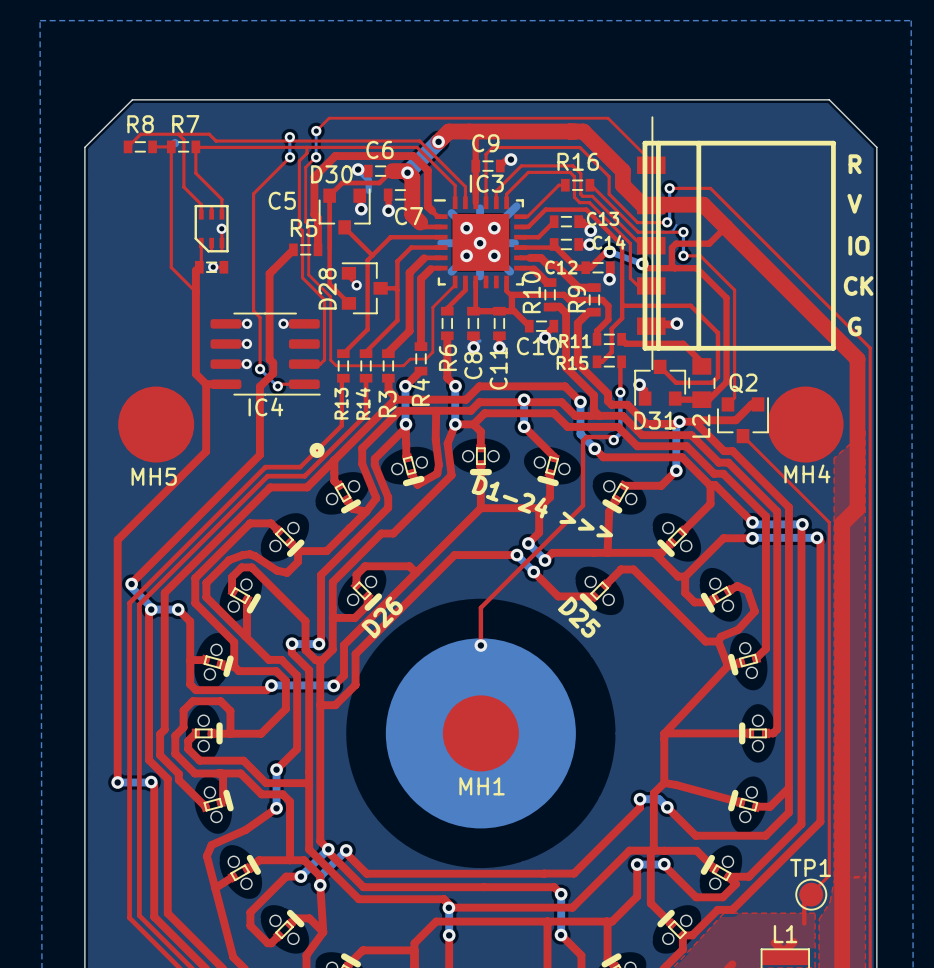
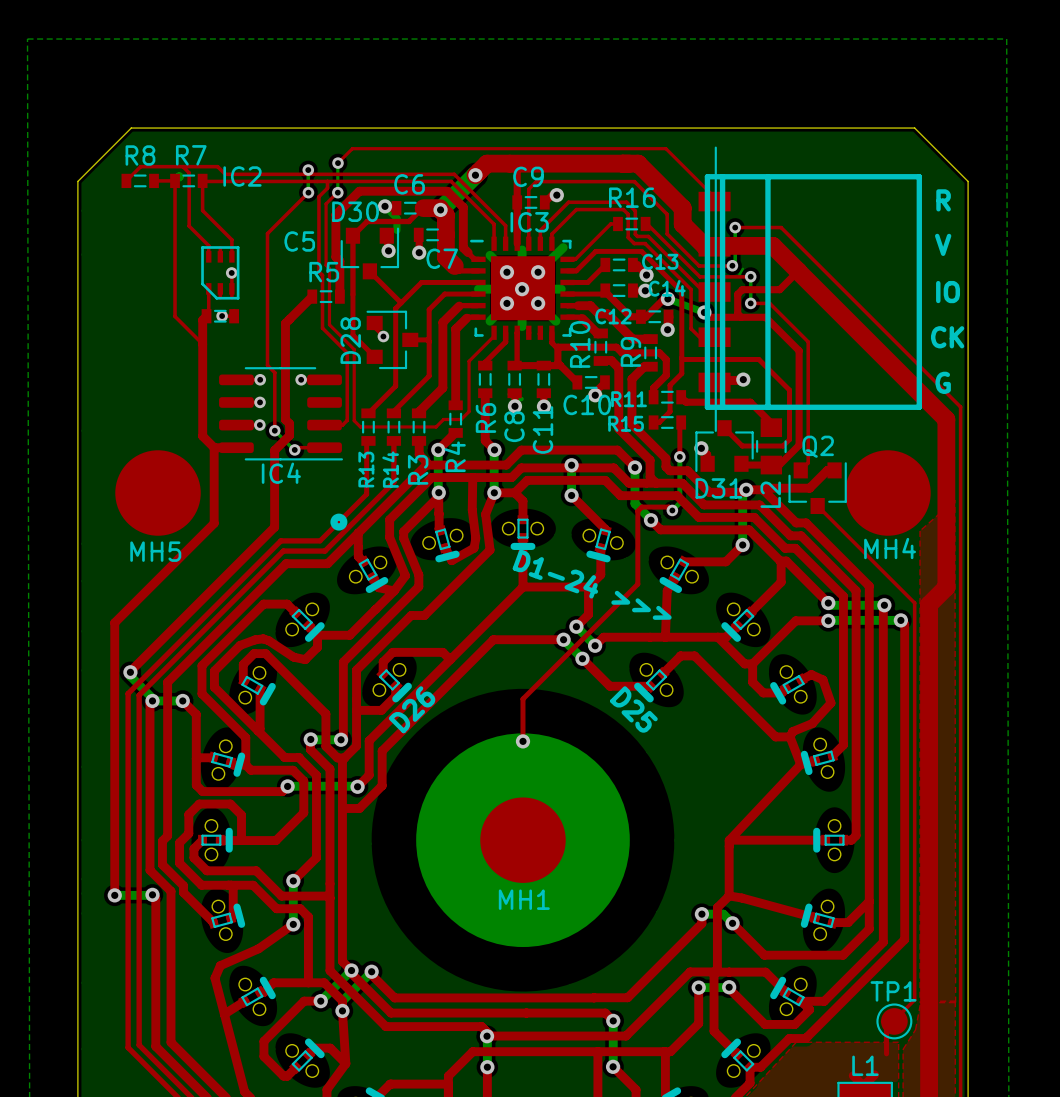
IC2 name: none -> IC2 (242, 176)

